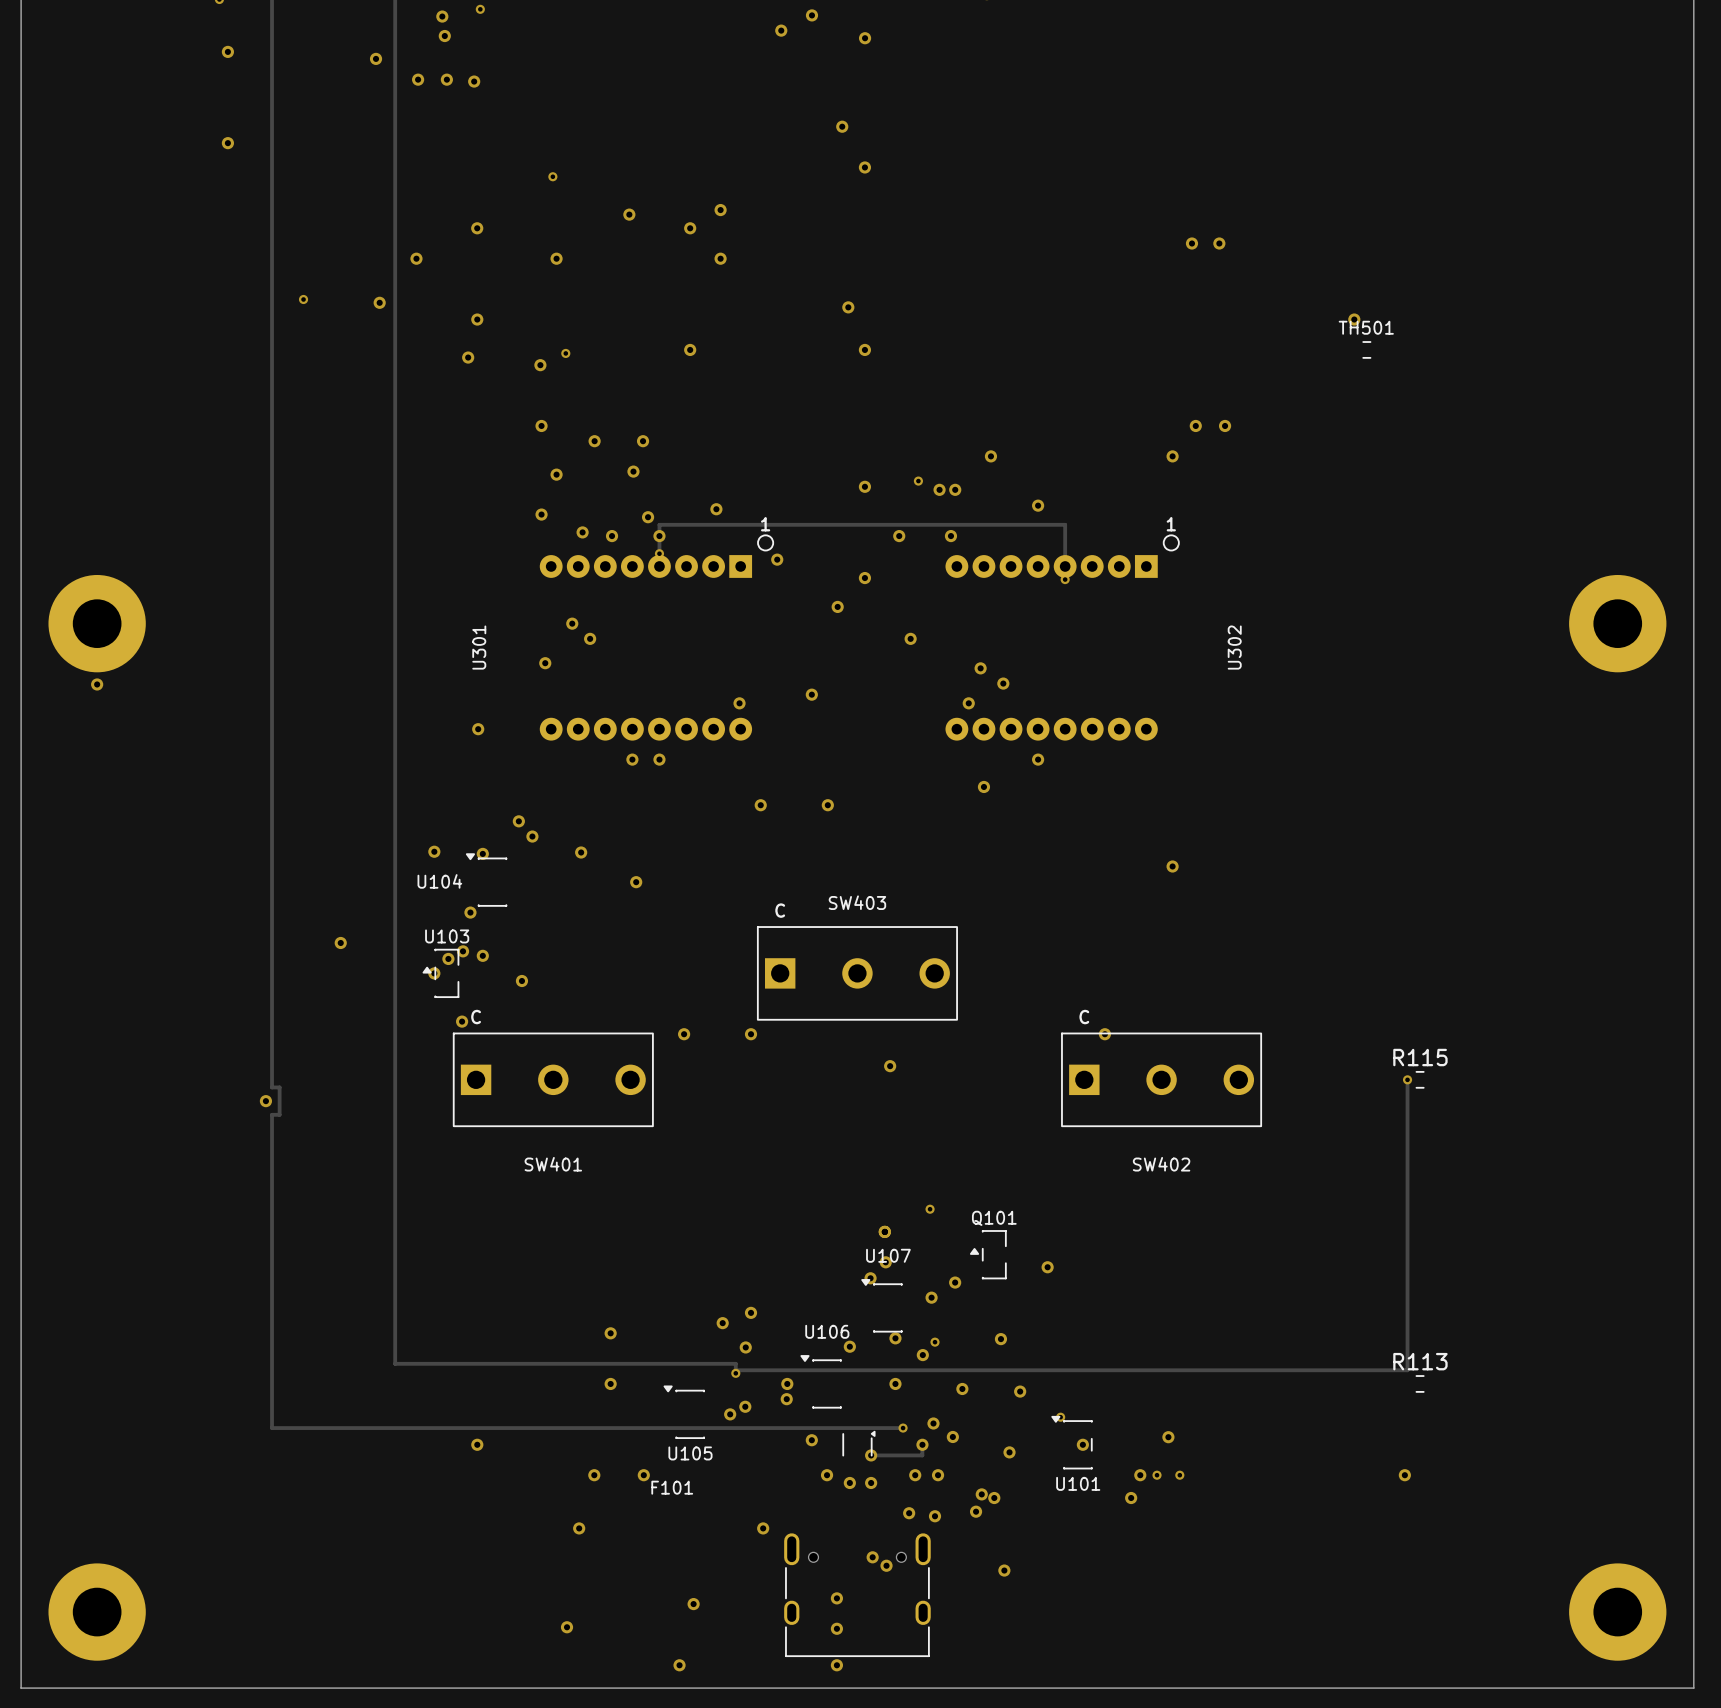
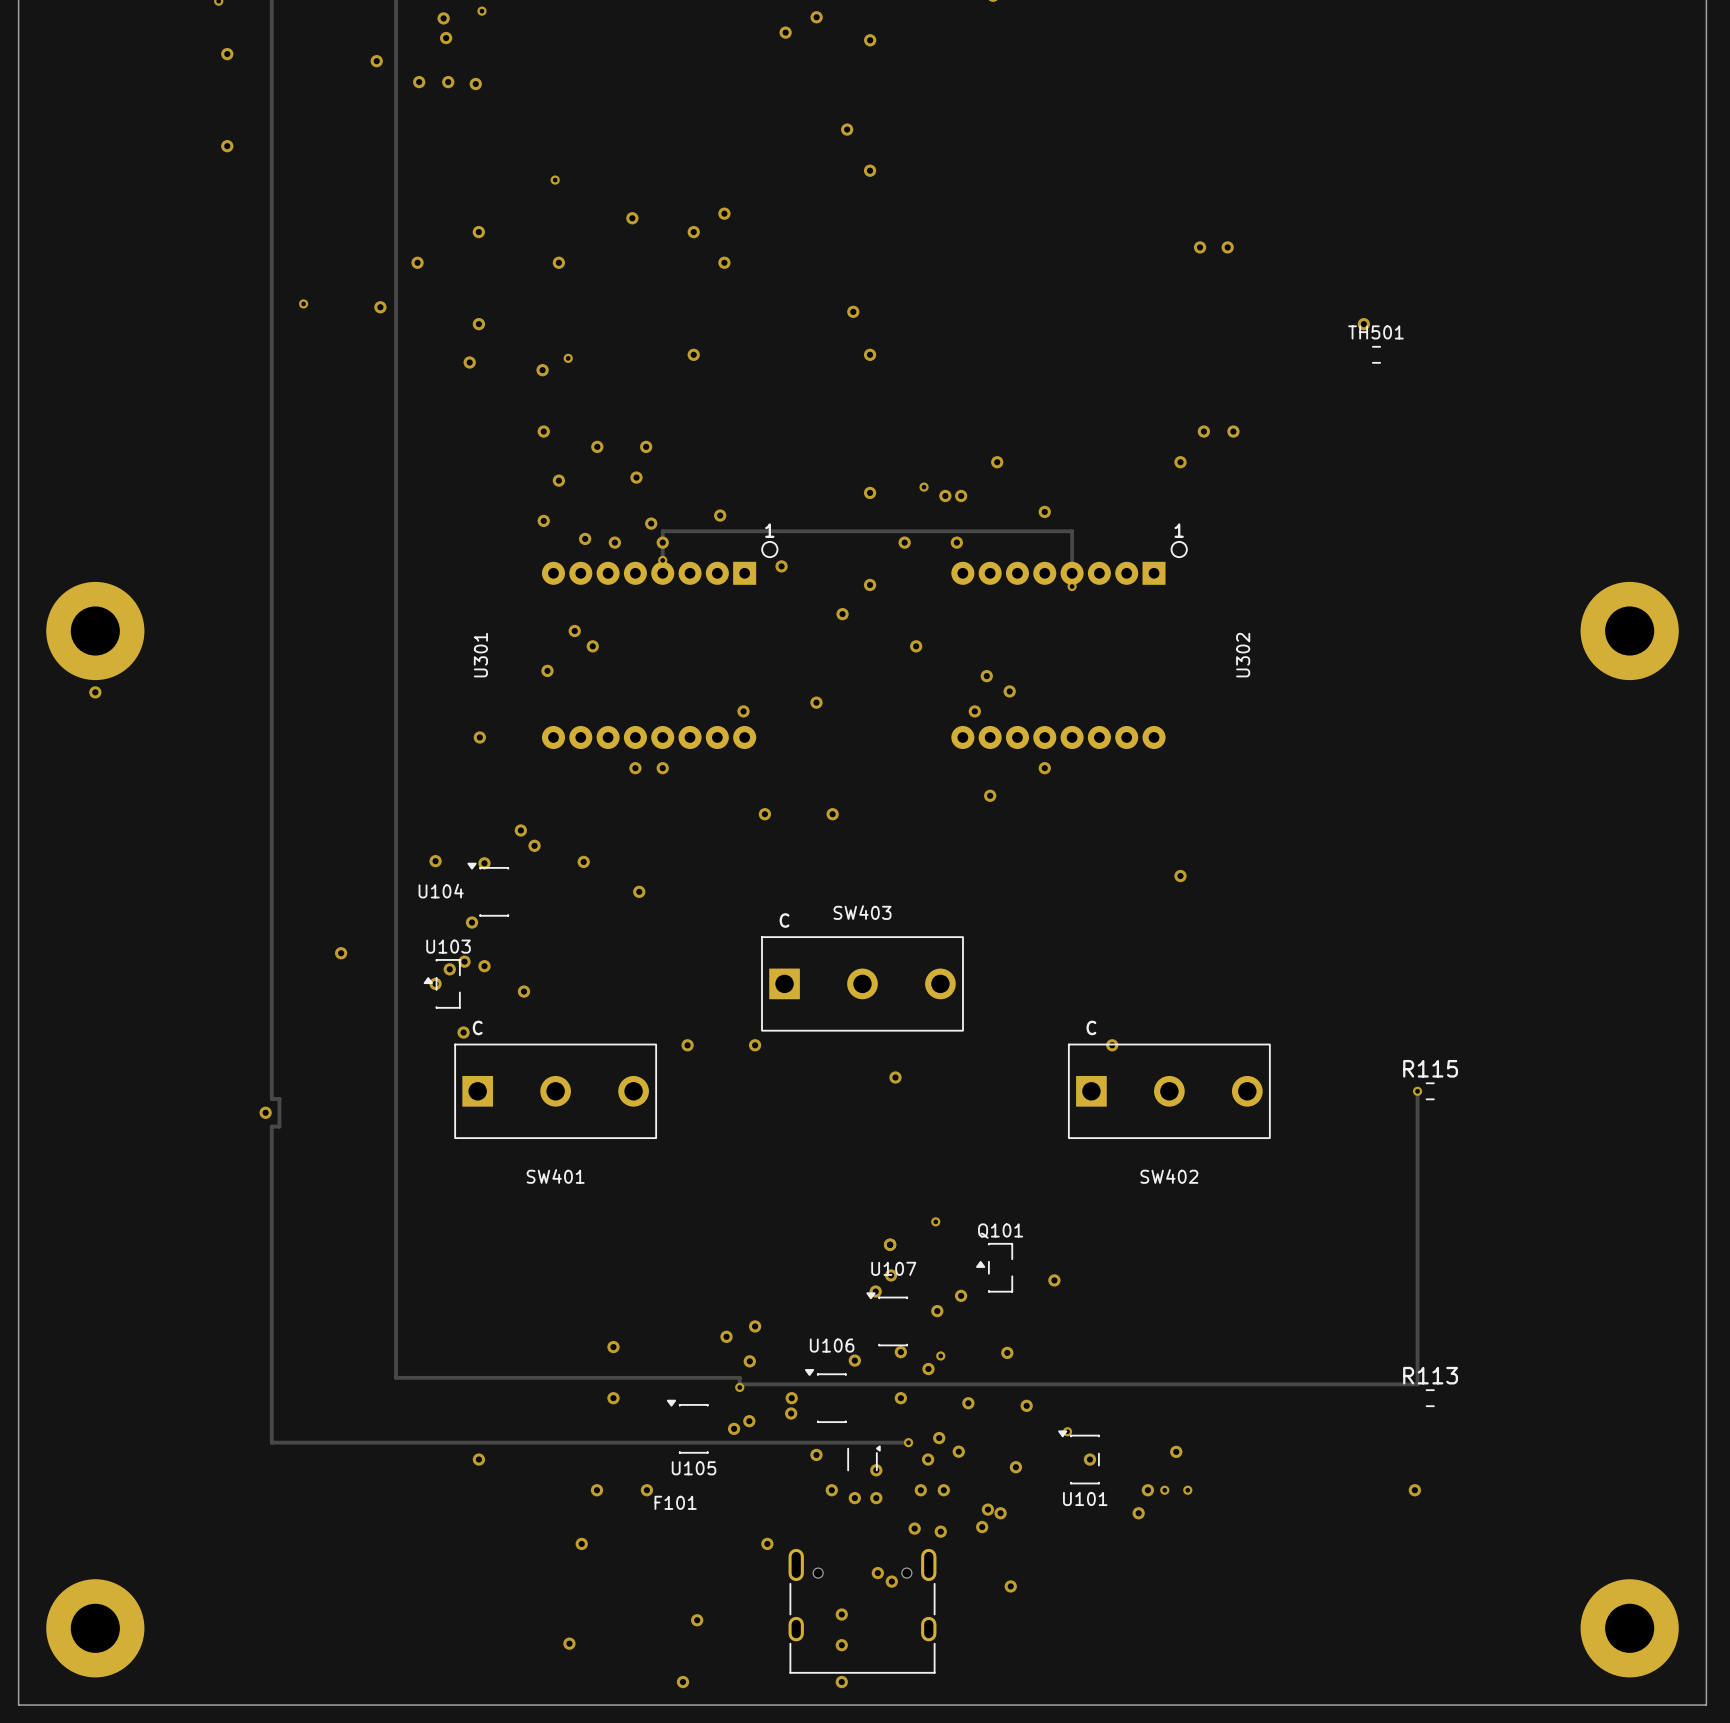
track: (922, 1444) (922, 1455) (871, 1455) -> none

